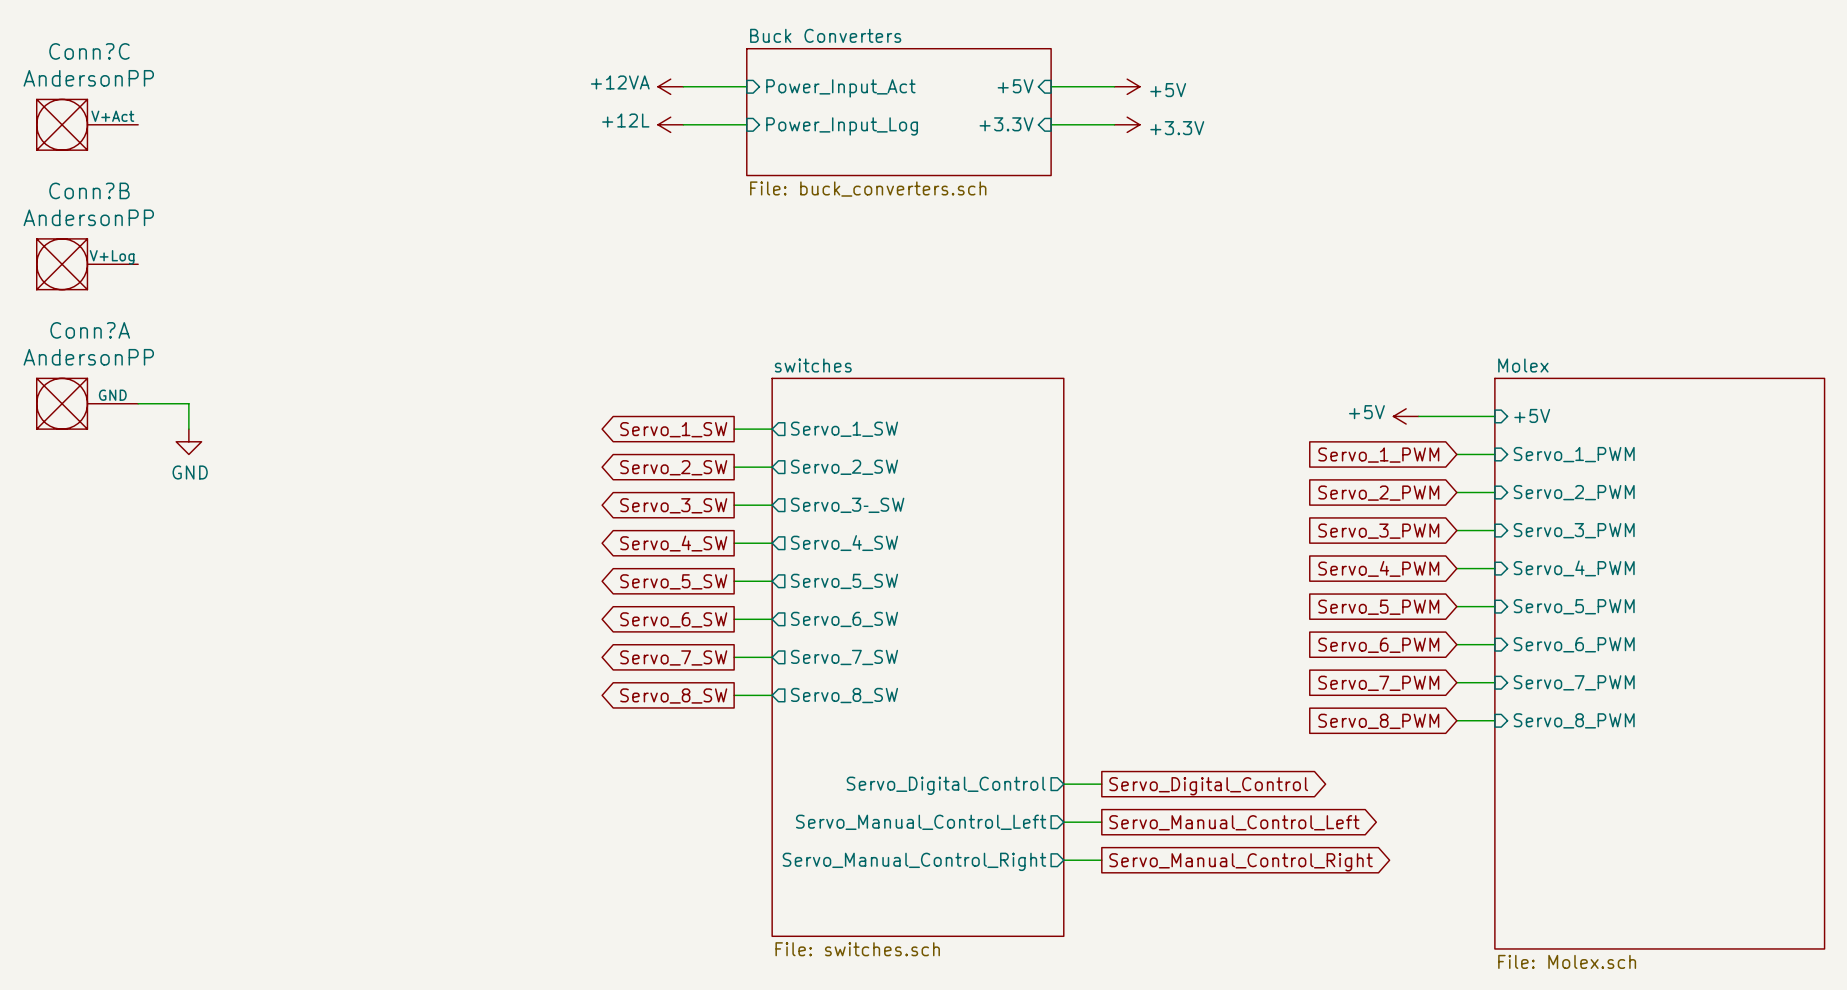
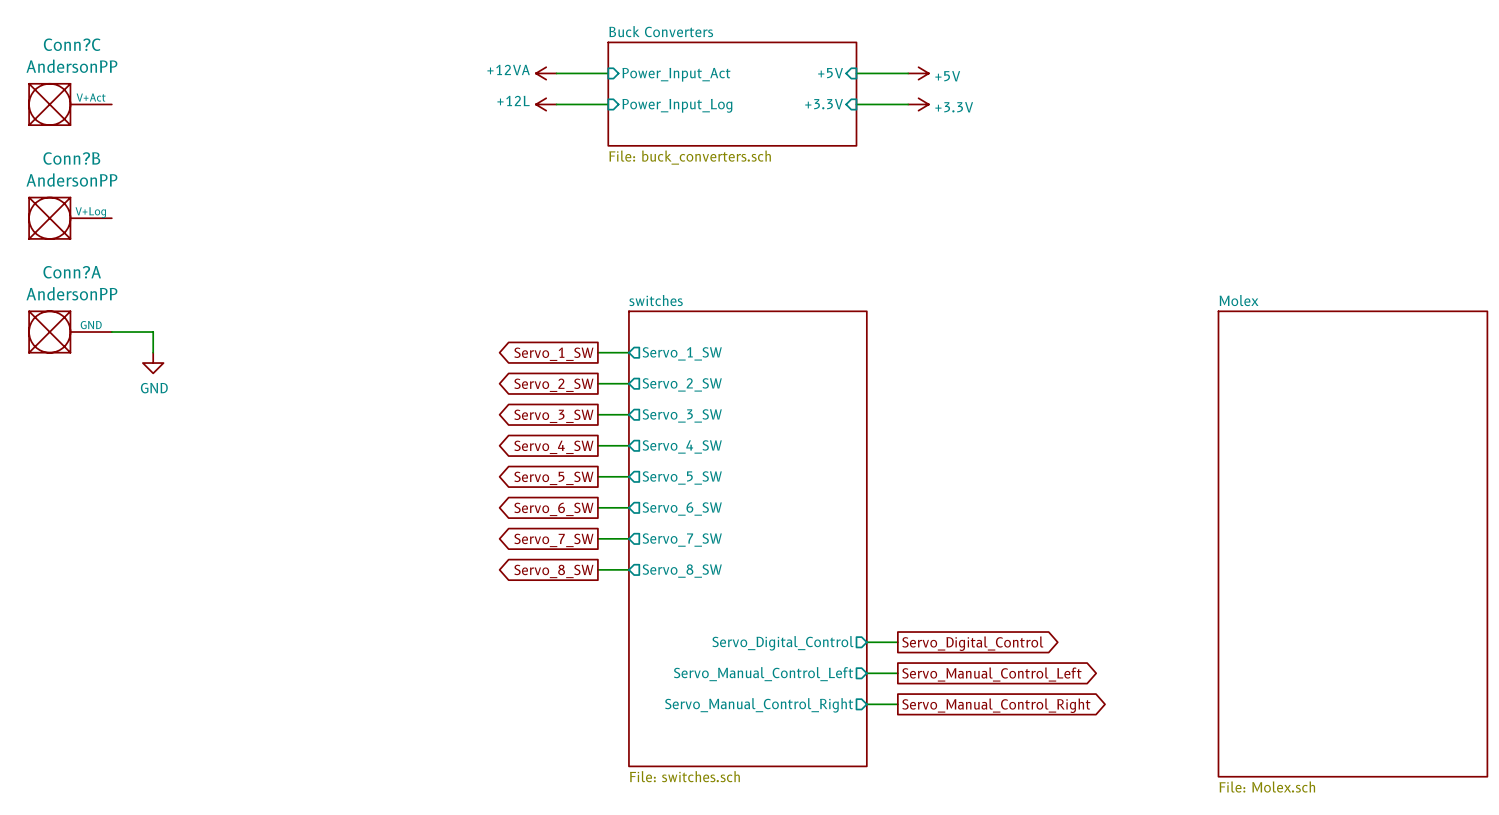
sheet pin: +5V (1532, 415) -> none
power symbol: +5V (1406, 416) -> none
wire: (1418, 416) (1494, 416) -> none
wire: (1456, 454) (1494, 454) -> none
sheet pin: Servo_1_PWM (1574, 454) -> none
global label: Servo_1_PWM (1378, 455) -> none
wire: (1456, 492) (1494, 492) -> none
sheet pin: Servo_2_PWM (1574, 492) -> none
global label: Servo_2_PWM (1378, 493) -> none
wire: (1456, 530) (1494, 530) -> none
sheet pin: Servo_3_PWM (1574, 530) -> none
global label: Servo_3_PWM (1378, 531) -> none
global label: Servo_4_PWM (1378, 568) -> none
wire: (1456, 568) (1494, 568) -> none
sheet pin: Servo_4_PWM (1574, 568) -> none
wire: (1456, 606) (1494, 606) -> none
sheet pin: Servo_5_PWM (1574, 606) -> none
global label: Servo_5_PWM (1378, 607) -> none
wire: (1456, 644) (1494, 644) -> none
sheet pin: Servo_6_PWM (1574, 644) -> none
global label: Servo_6_PWM (1378, 645) -> none
wire: (1456, 682) (1494, 682) -> none
sheet pin: Servo_7_PWM (1574, 682) -> none
global label: Servo_7_PWM (1378, 683) -> none
wire: (1456, 720) (1494, 720) -> none
sheet pin: Servo_8_PWM (1574, 720) -> none
global label: Servo_8_PWM (1378, 721) -> none

